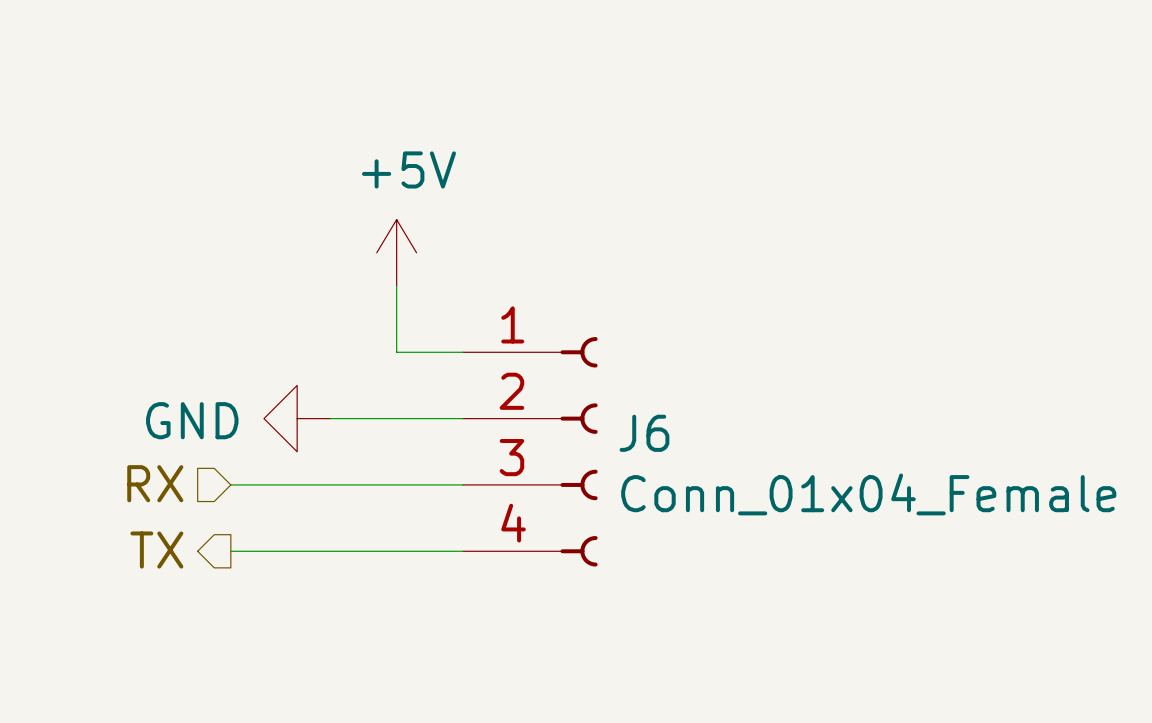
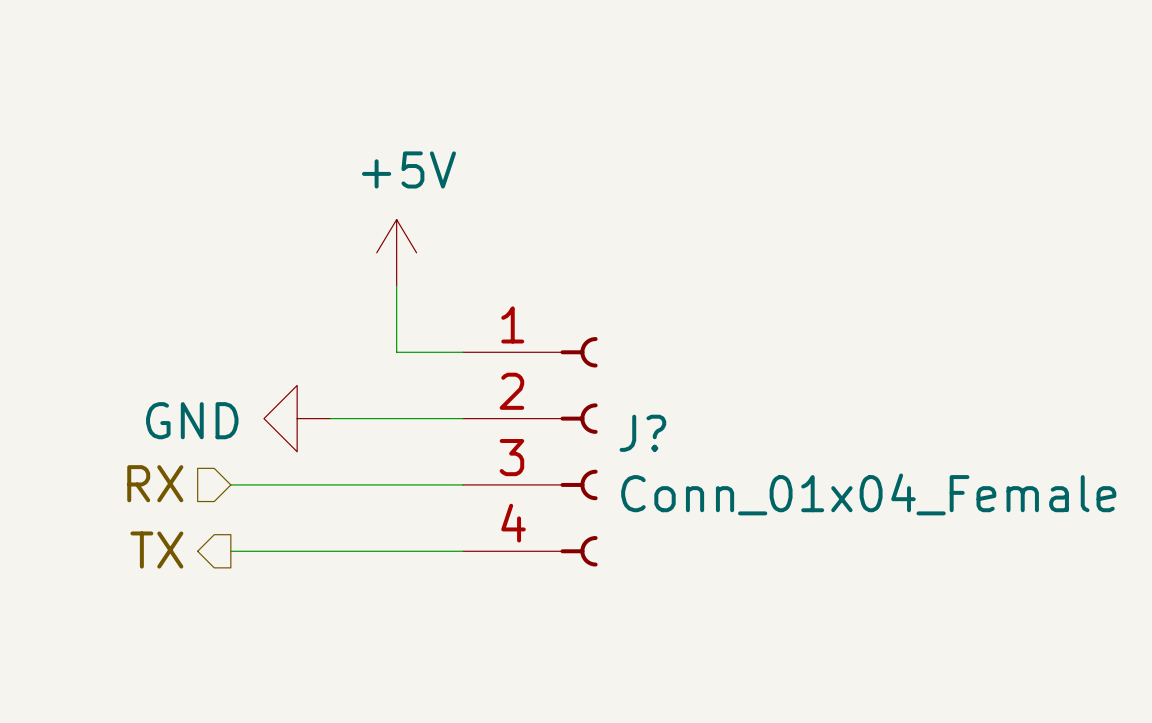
J6 name: J6 (644, 433) -> J? (642, 433)

